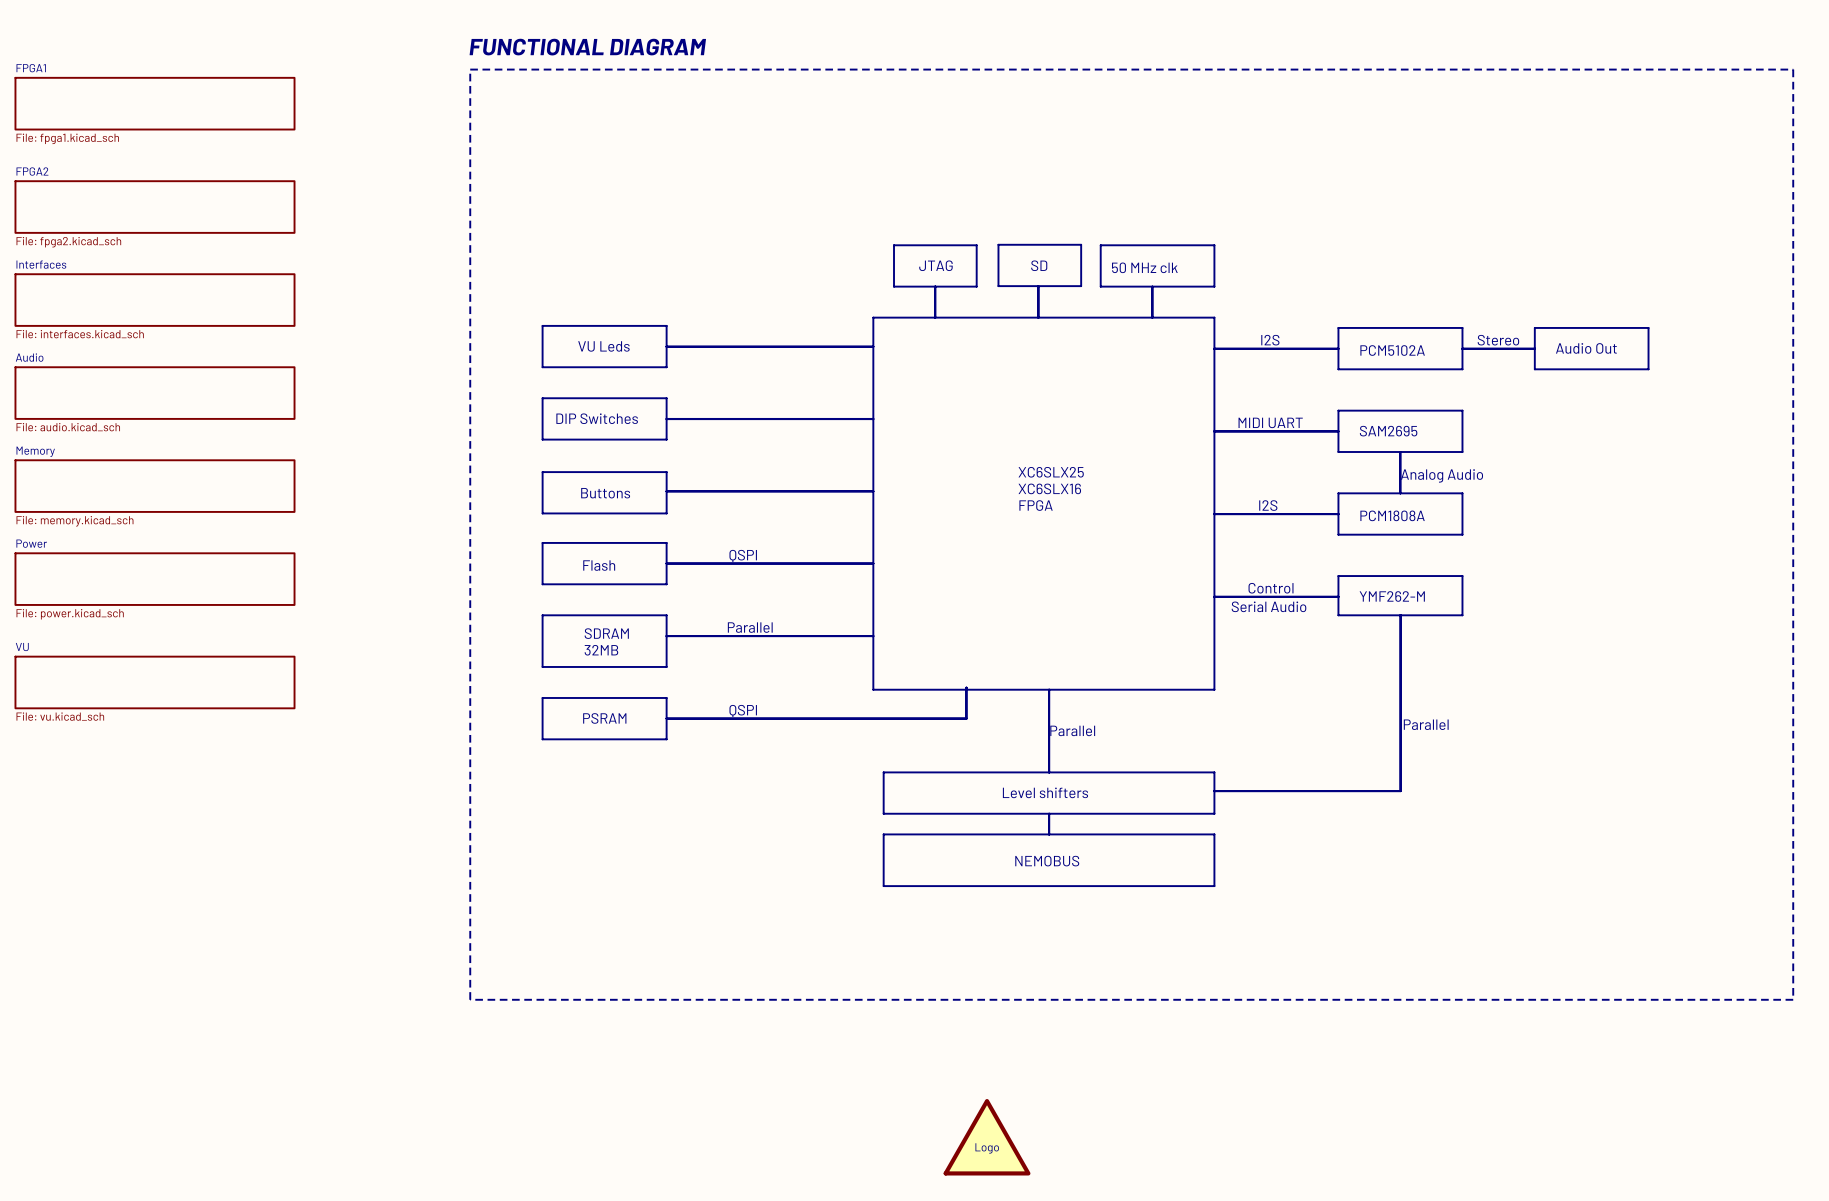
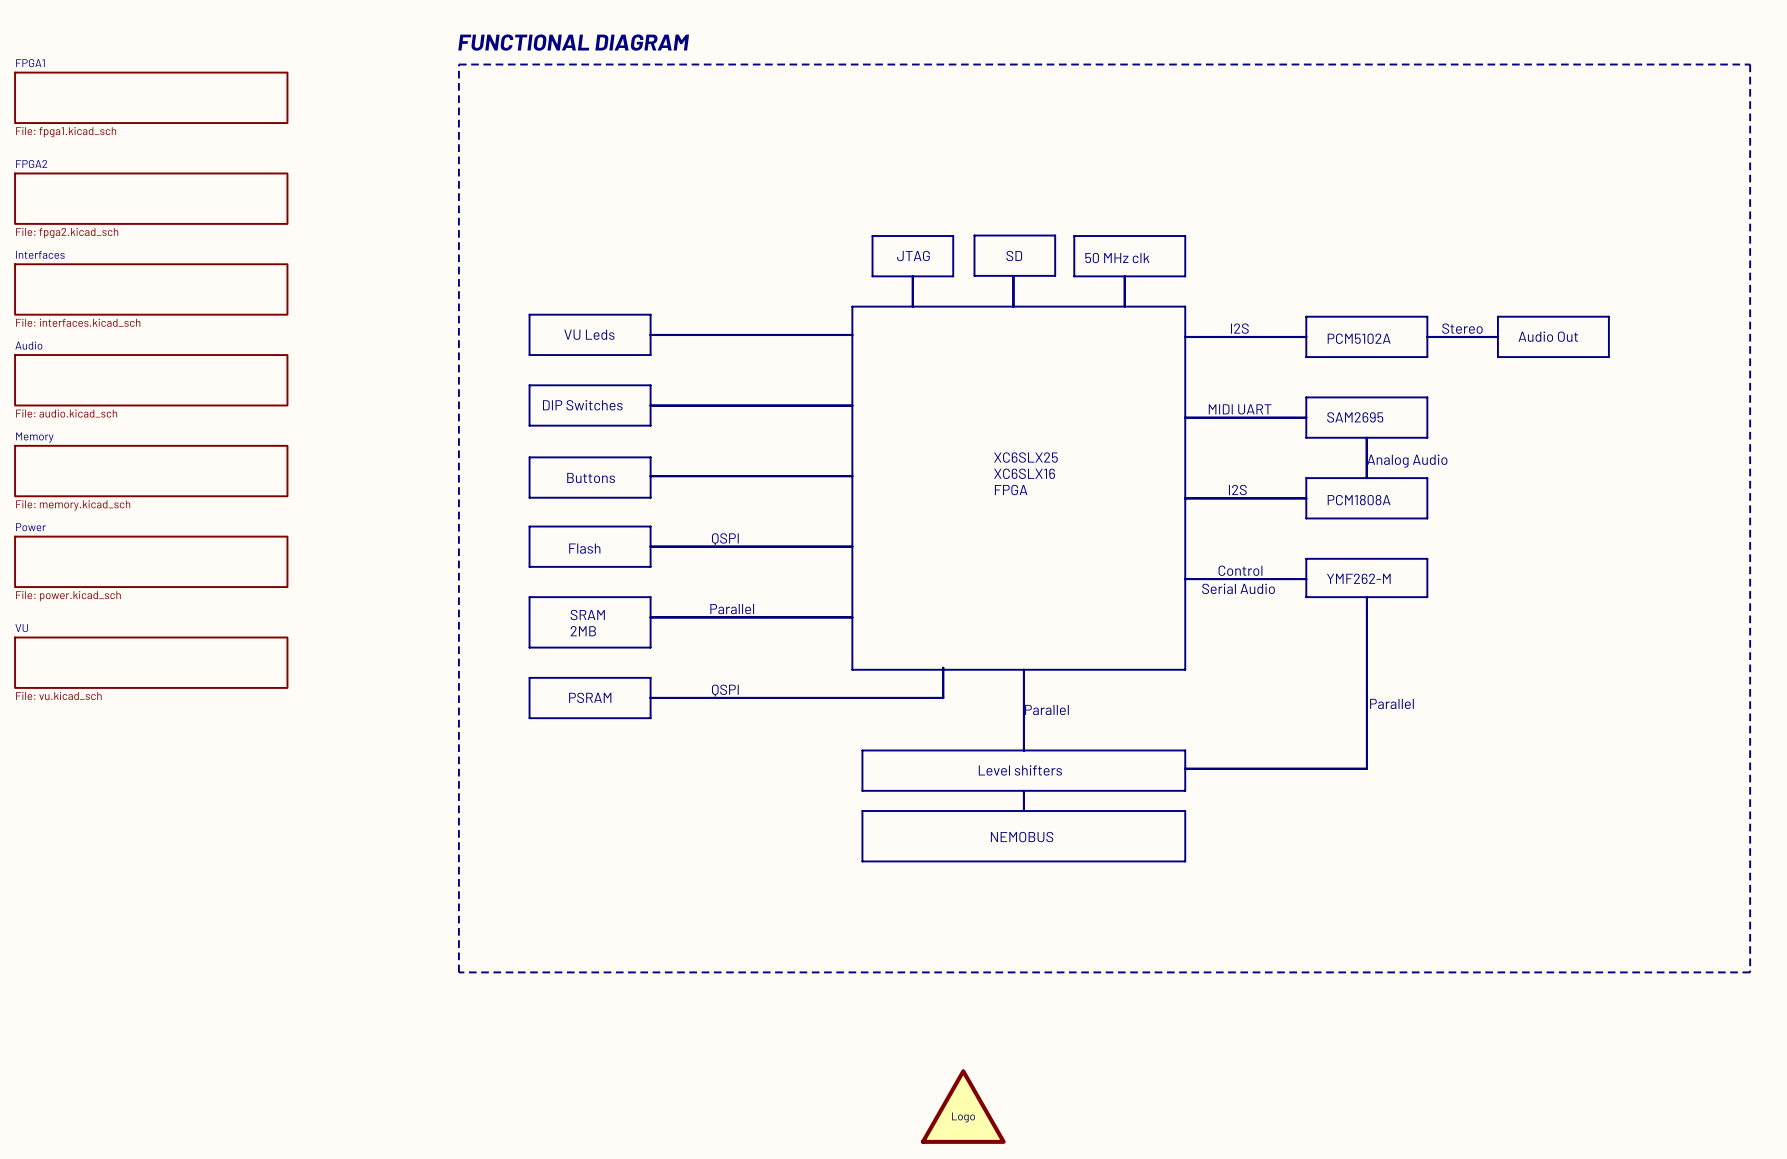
text: SDRAM (606, 633) -> SRAM (587, 615)
text: 32MB (601, 650) -> 2MB (583, 631)

